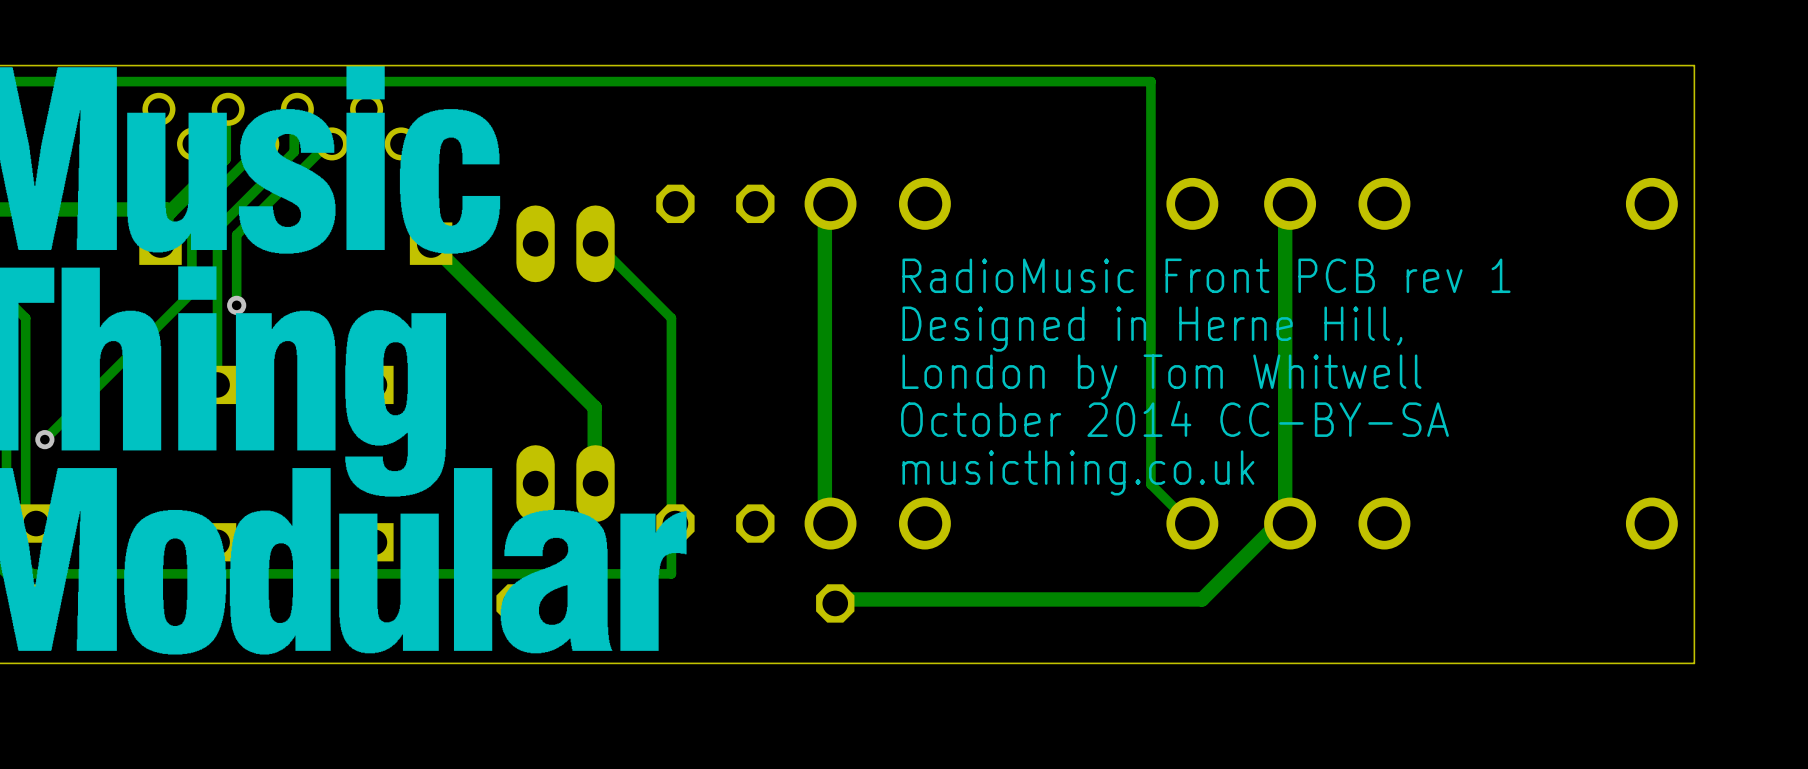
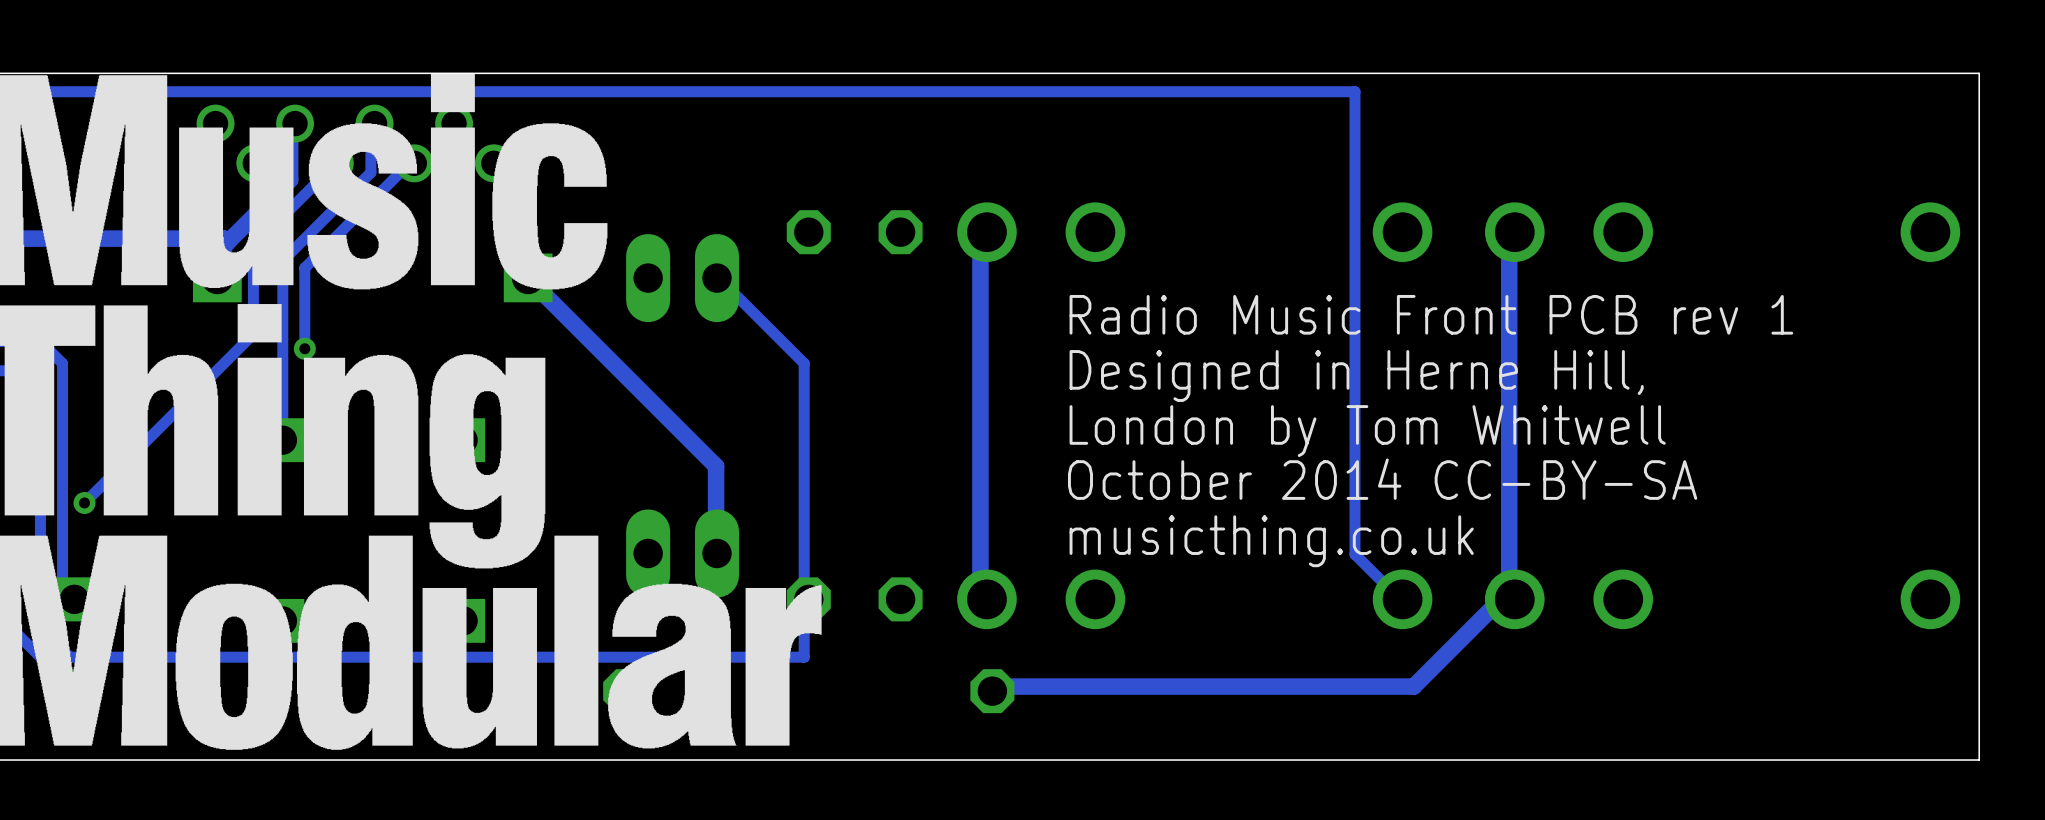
text: RadioMusic Front PCB rev 1 (1206, 275) -> Radio Music Front PCB rev 1 (1431, 314)

